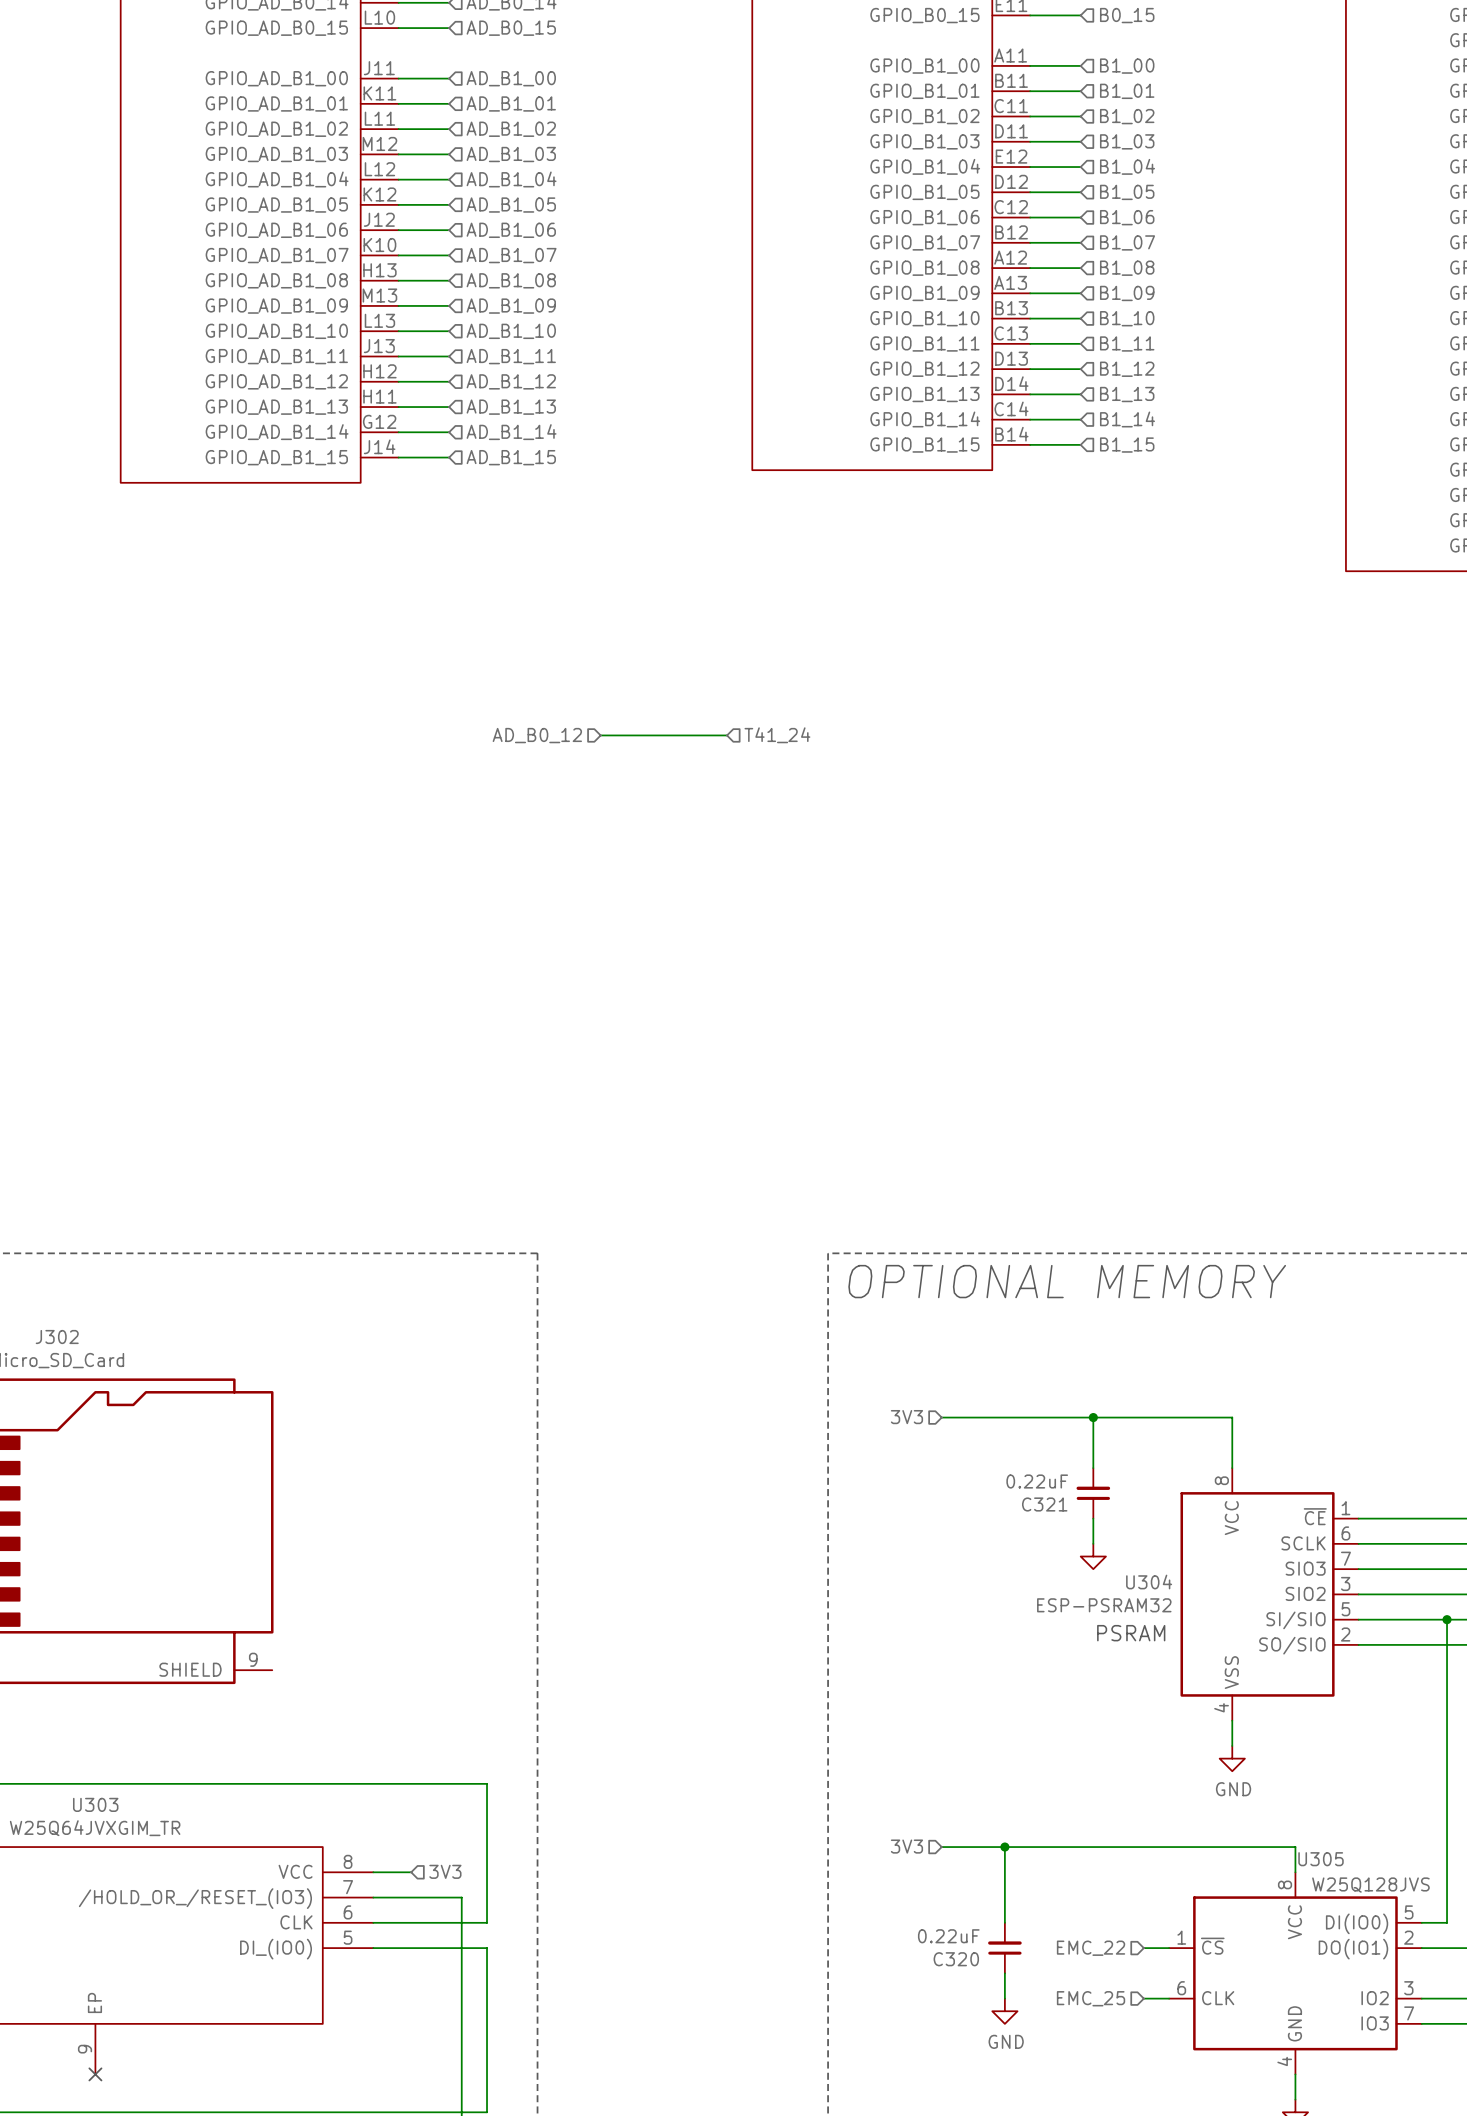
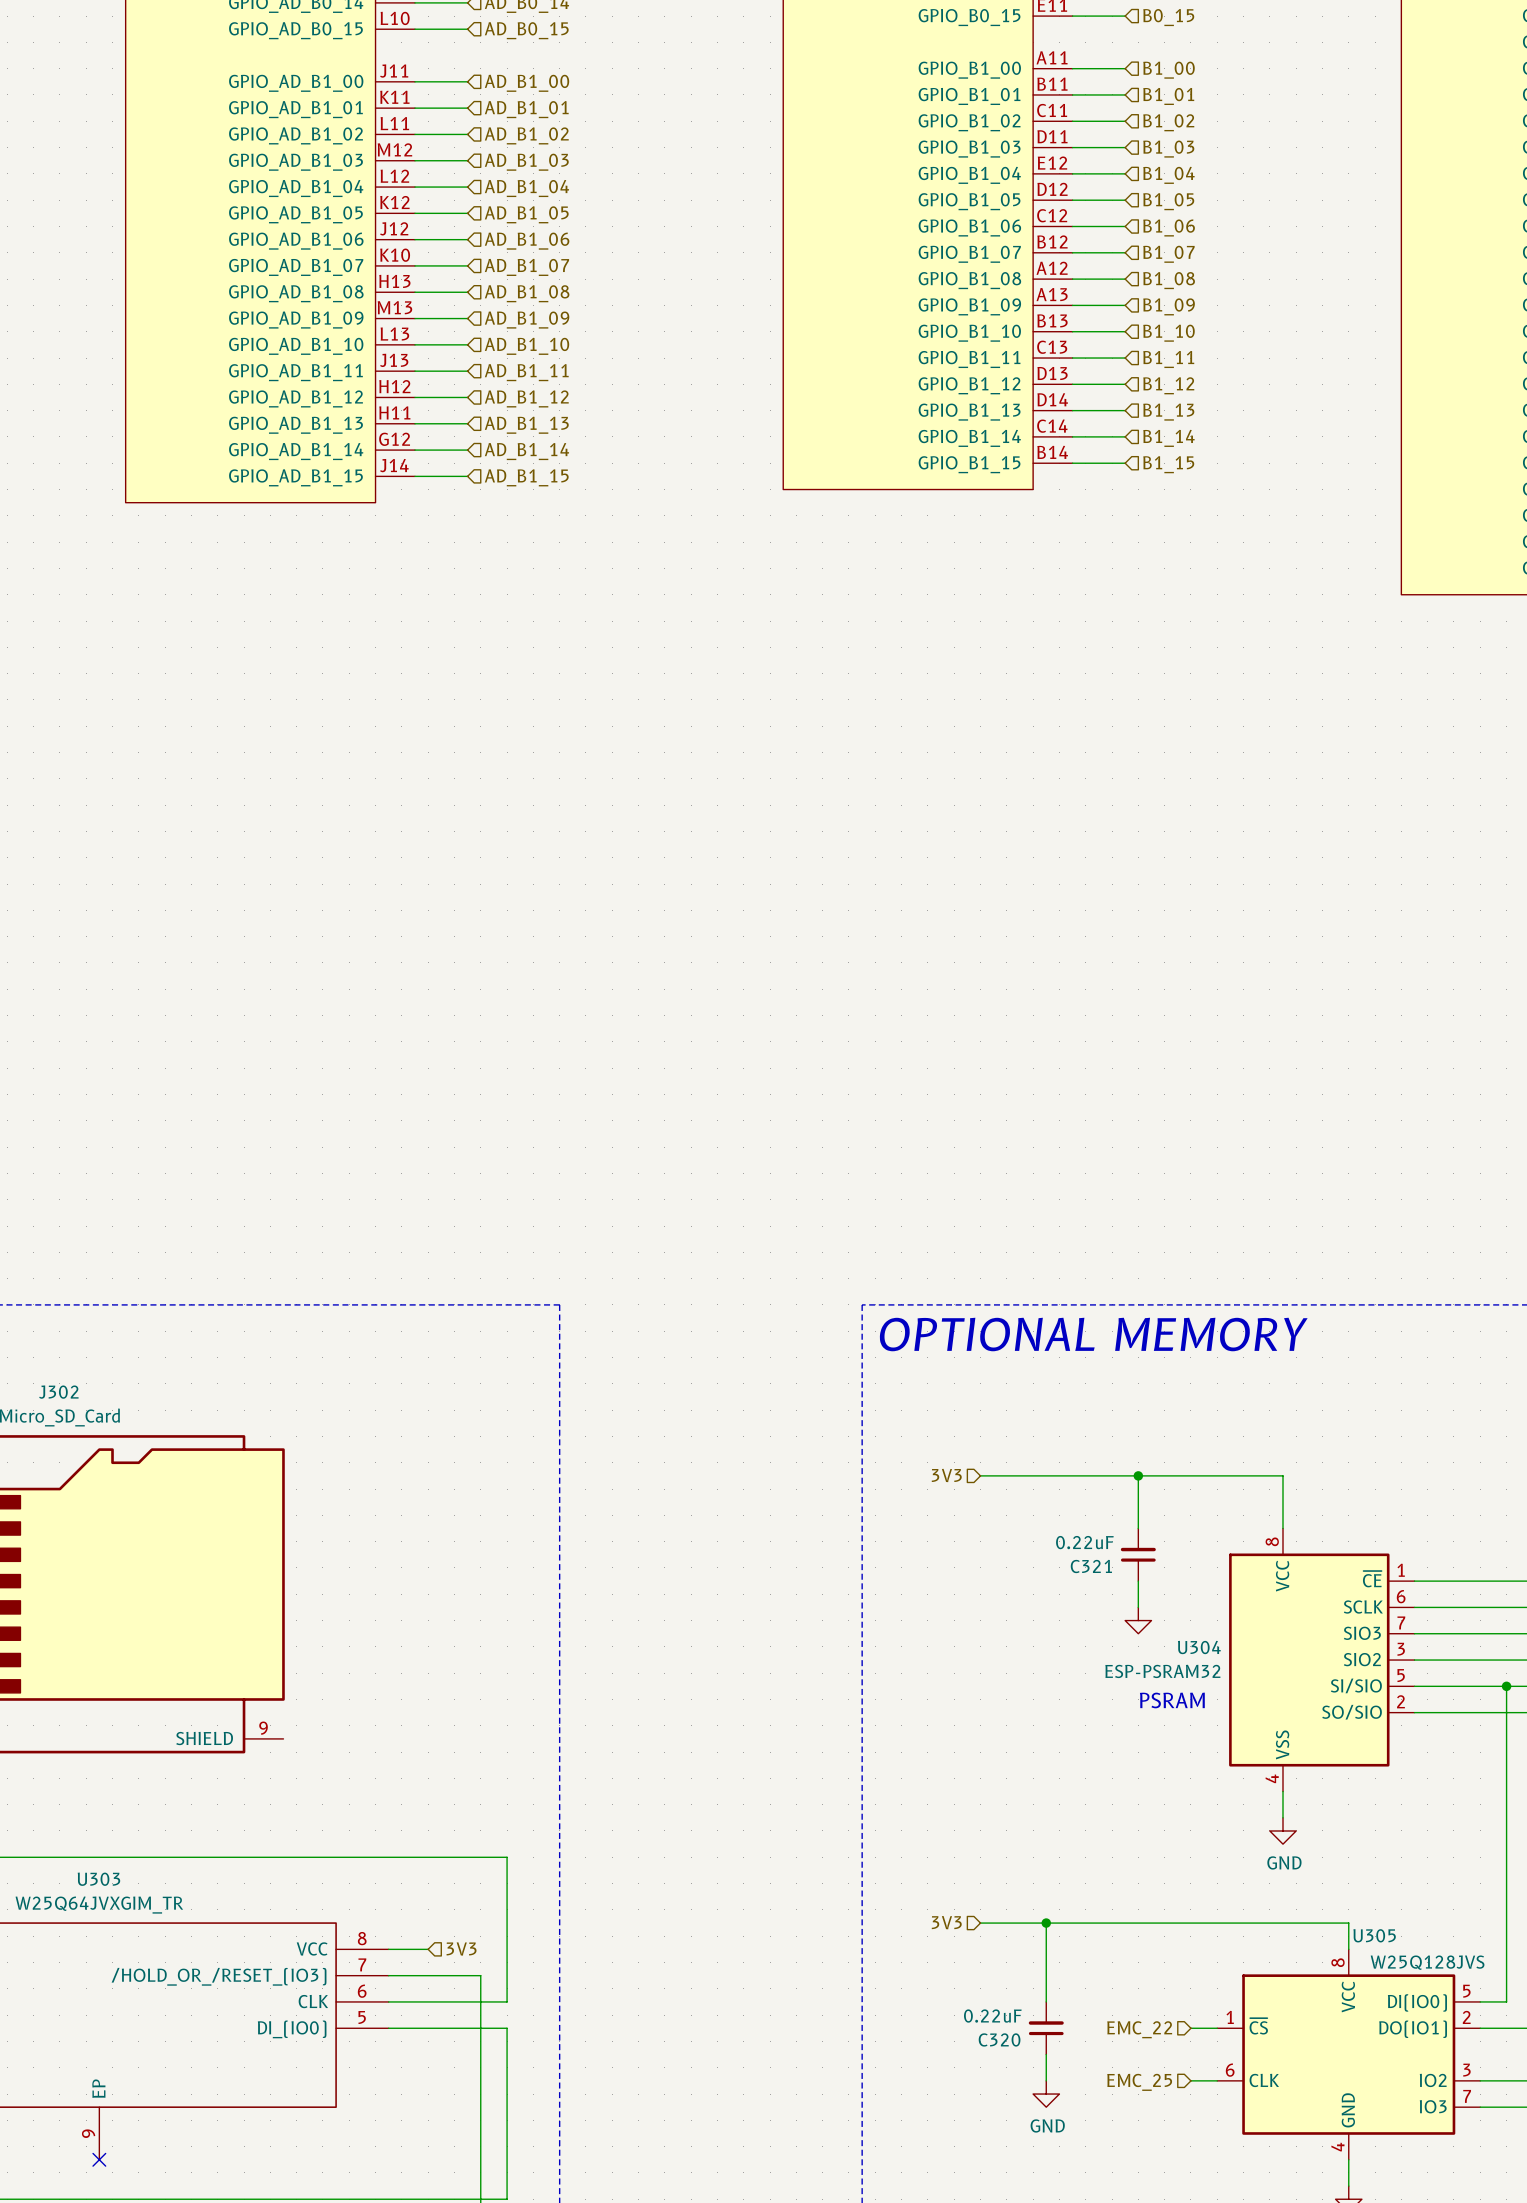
hierarchical label: AD_B0_12 (537, 735) -> none
wire: (600, 735) (727, 735) -> none
hierarchical label: T41_24 (777, 735) -> none

